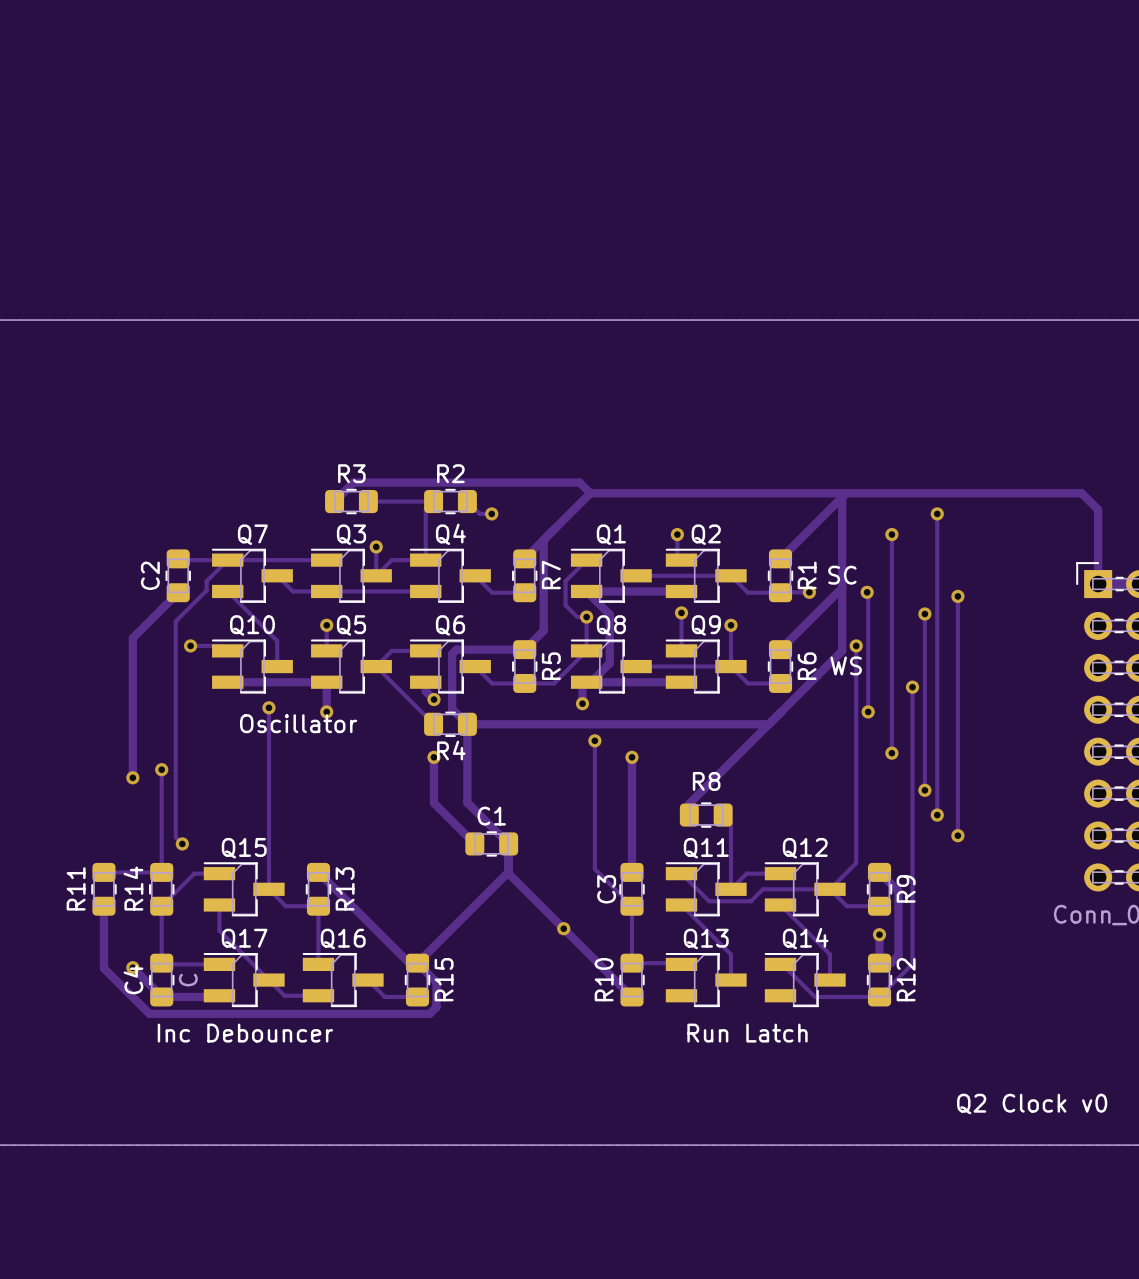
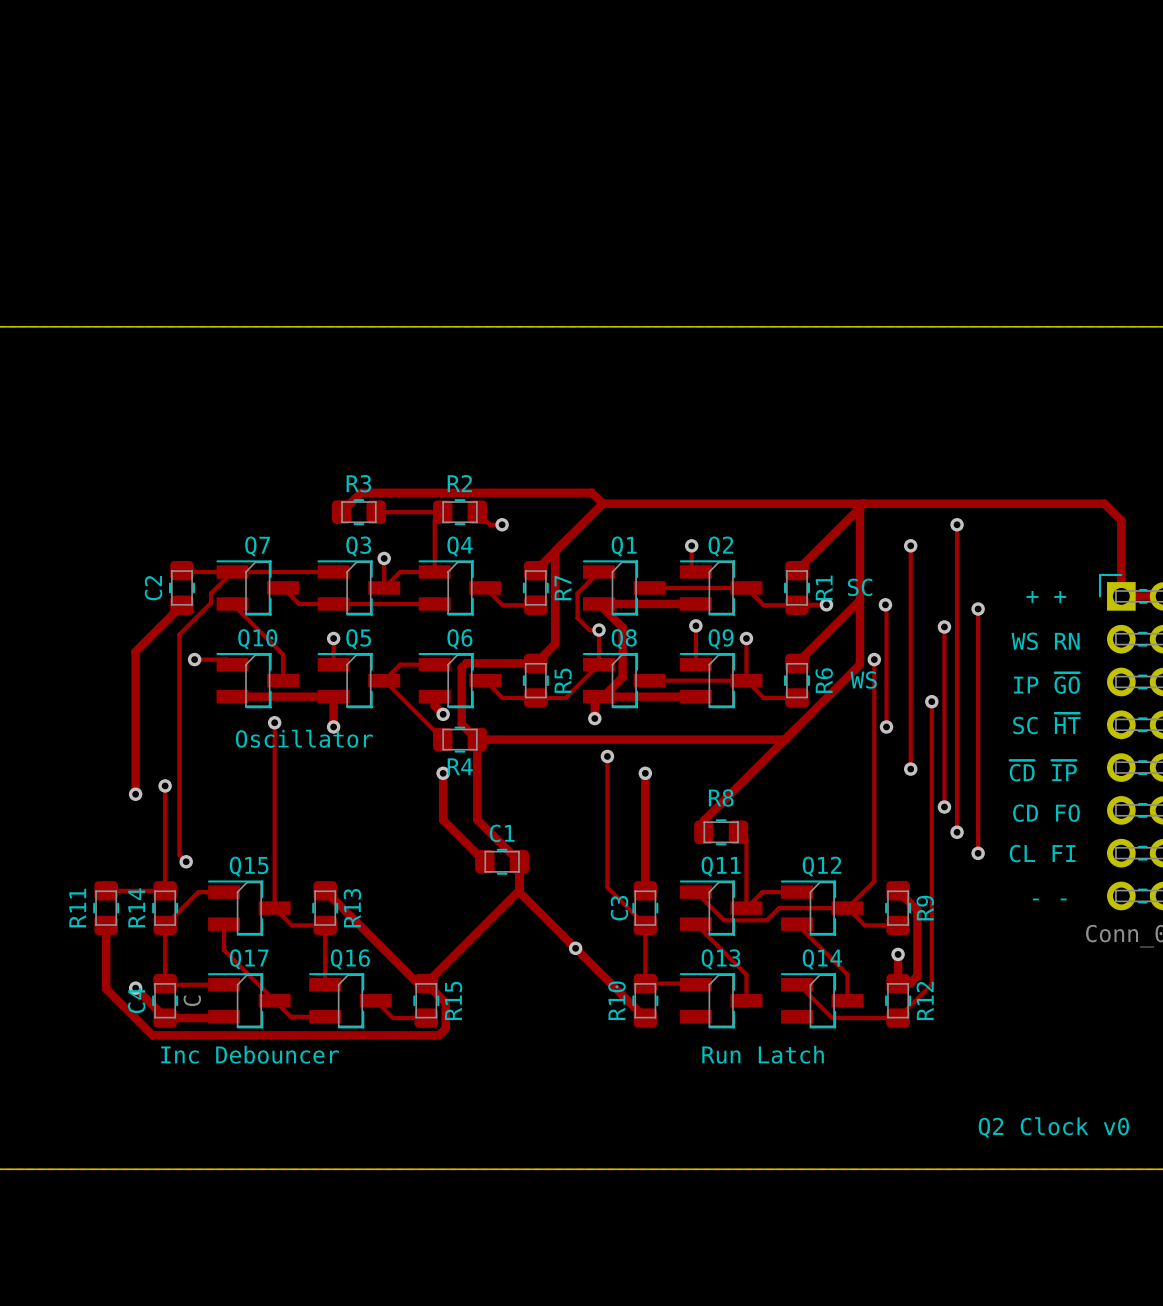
text: none -> + + (1046, 596)
text: none -> WS RN (1045, 641)
text: none -> IP ~{GO} (1046, 683)
text: none -> SC ~{HT} (1046, 723)
text: none -> ~{CD} ~{IP} (1043, 770)
text: none -> CD FO (1046, 813)
text: none -> CL FI (1042, 853)
text: none -> - - (1049, 899)

